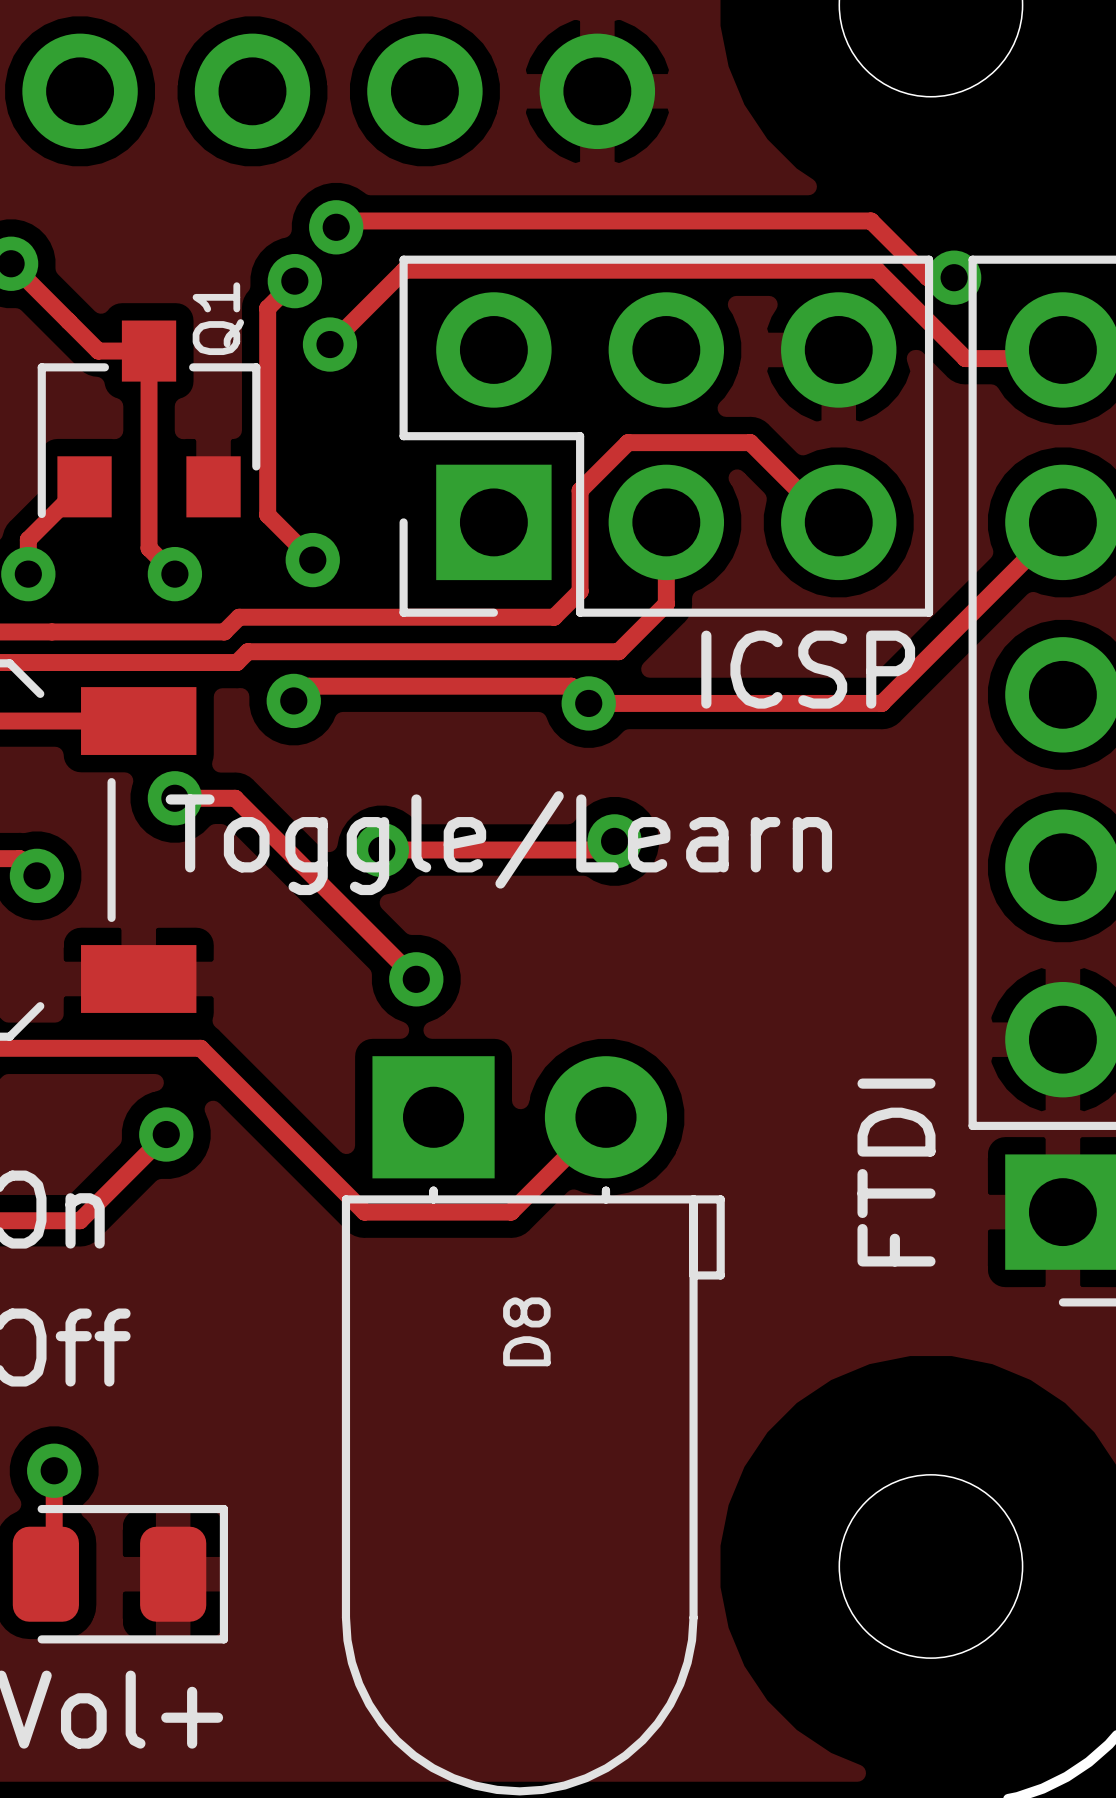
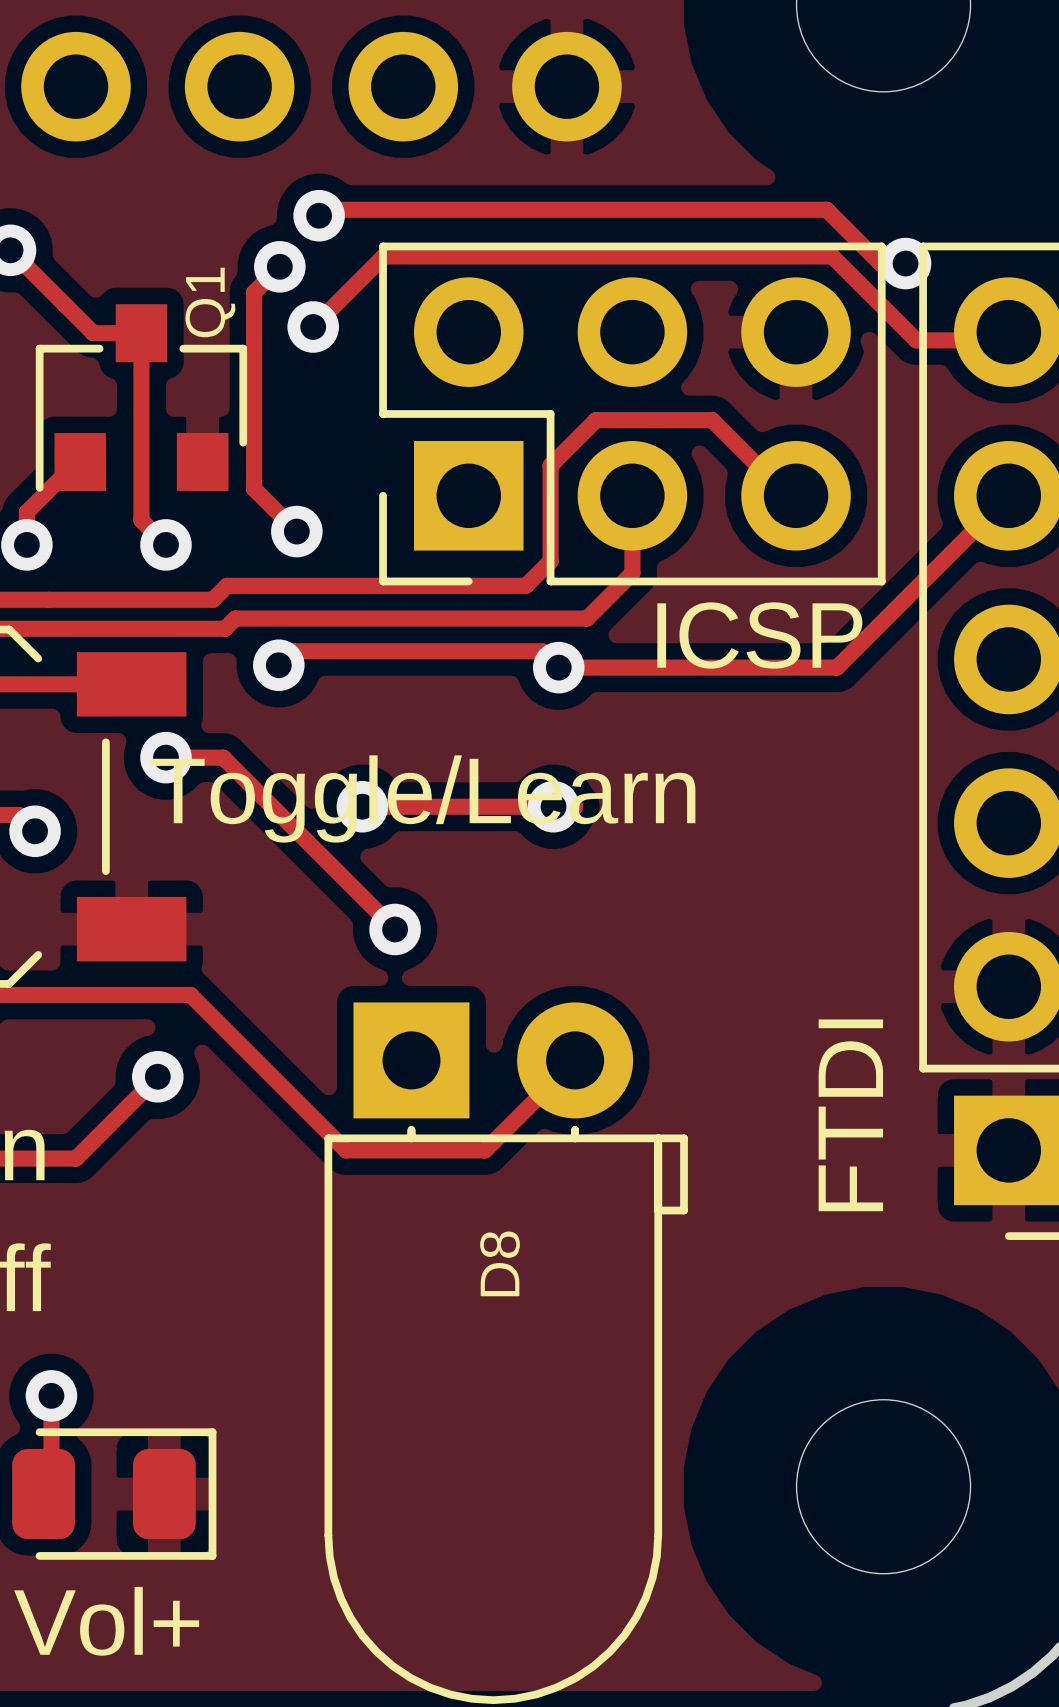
via position: (614, 841) -> (553, 806)

